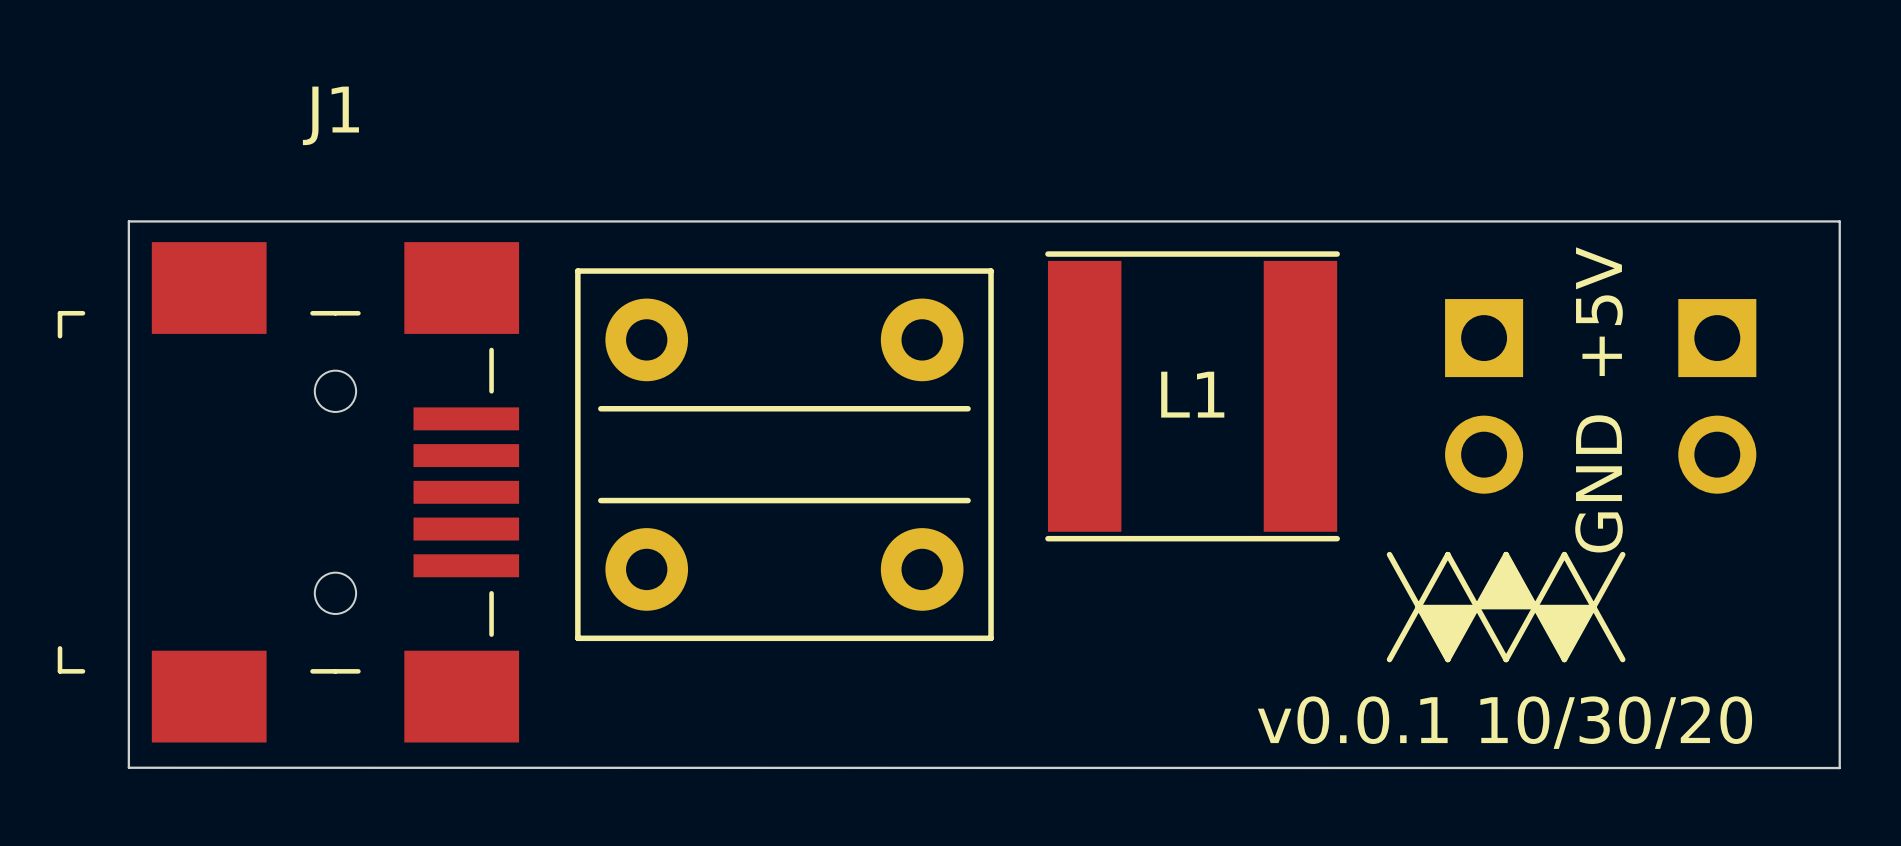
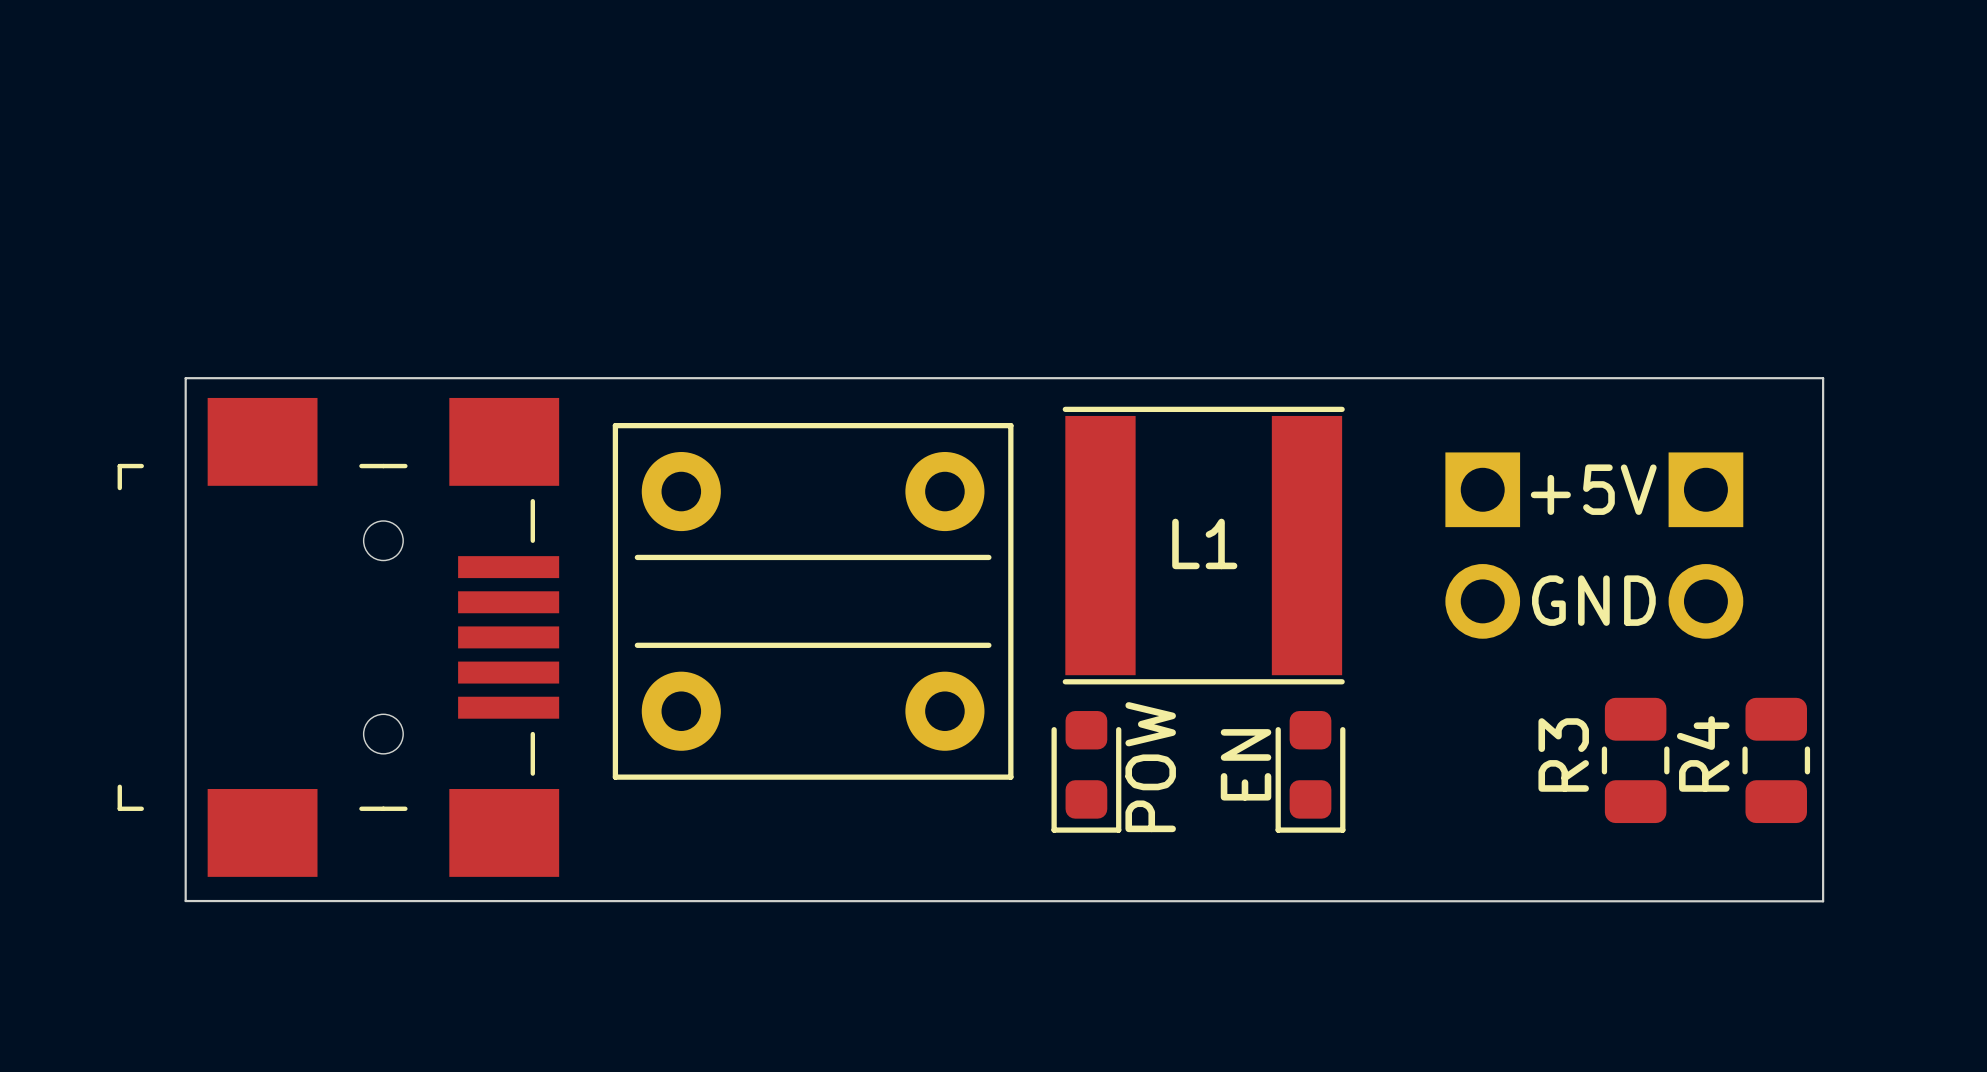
J1 name: J1 (330, 115) -> none
text rotation: 0° (1599, 311) -> 90° clockwise (1593, 489)
text rotation: 0° (1599, 483) -> 90° clockwise (1593, 600)
drawing: [1386, 551, 1626, 663] -> none
R3: none -> (1635, 760)
R4: none -> (1776, 760)
POW: none -> (1086, 771)
EN: none -> (1310, 771)
text: v0.0.1 10/30/20 (1504, 722) -> none

